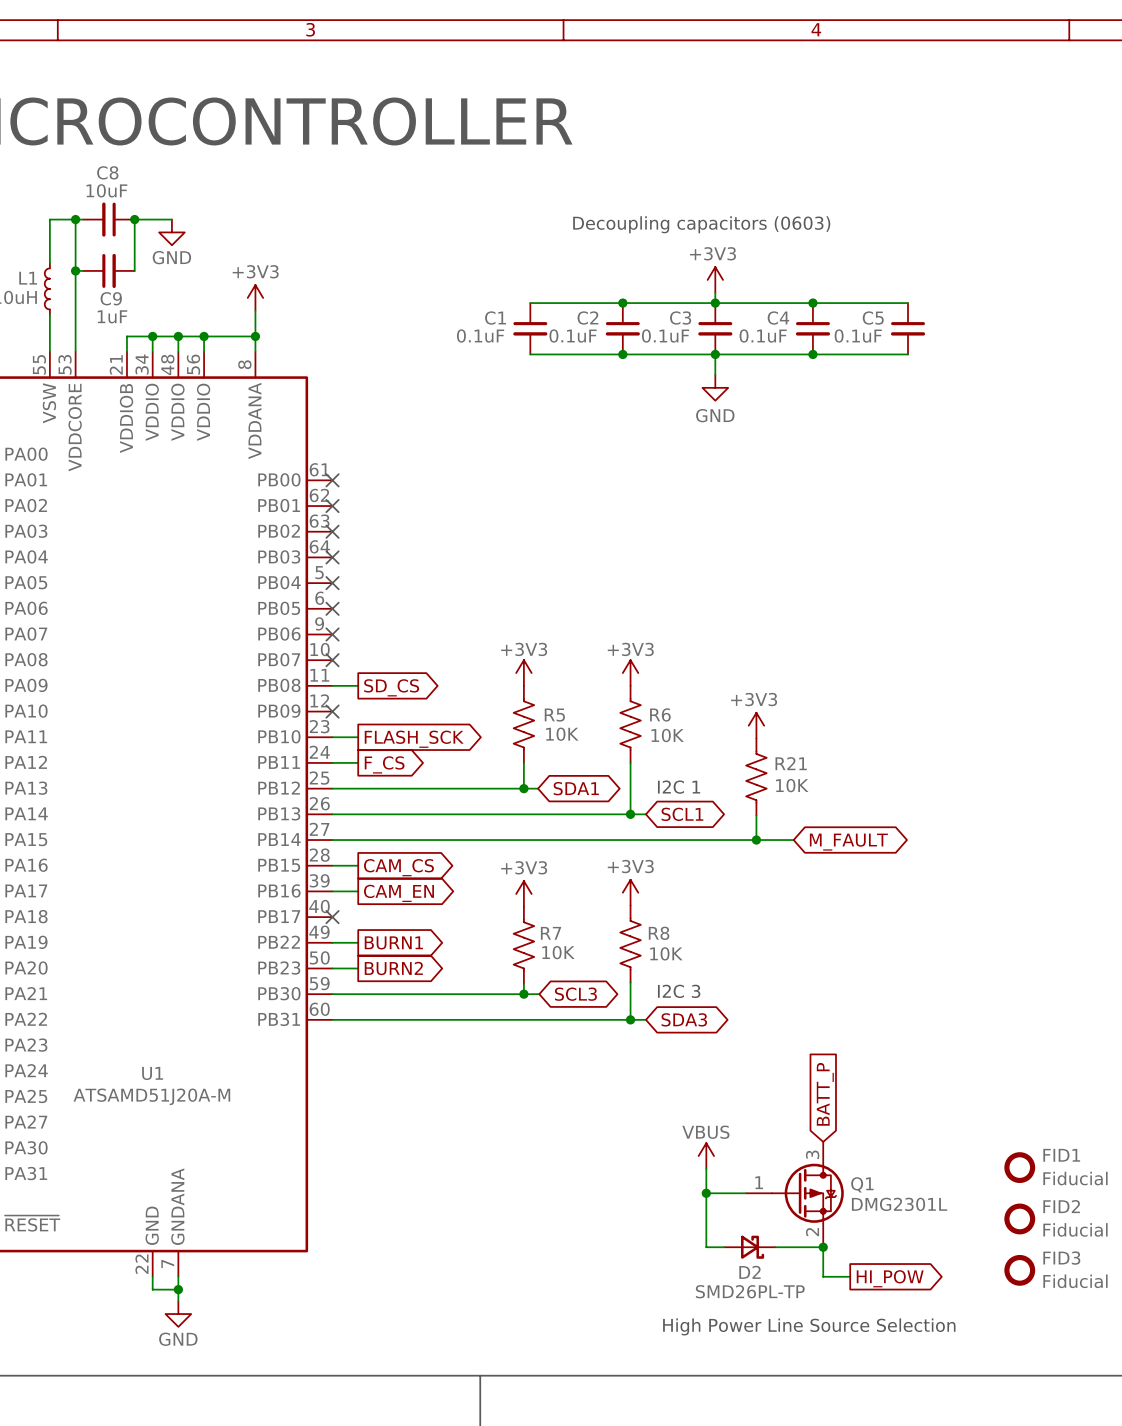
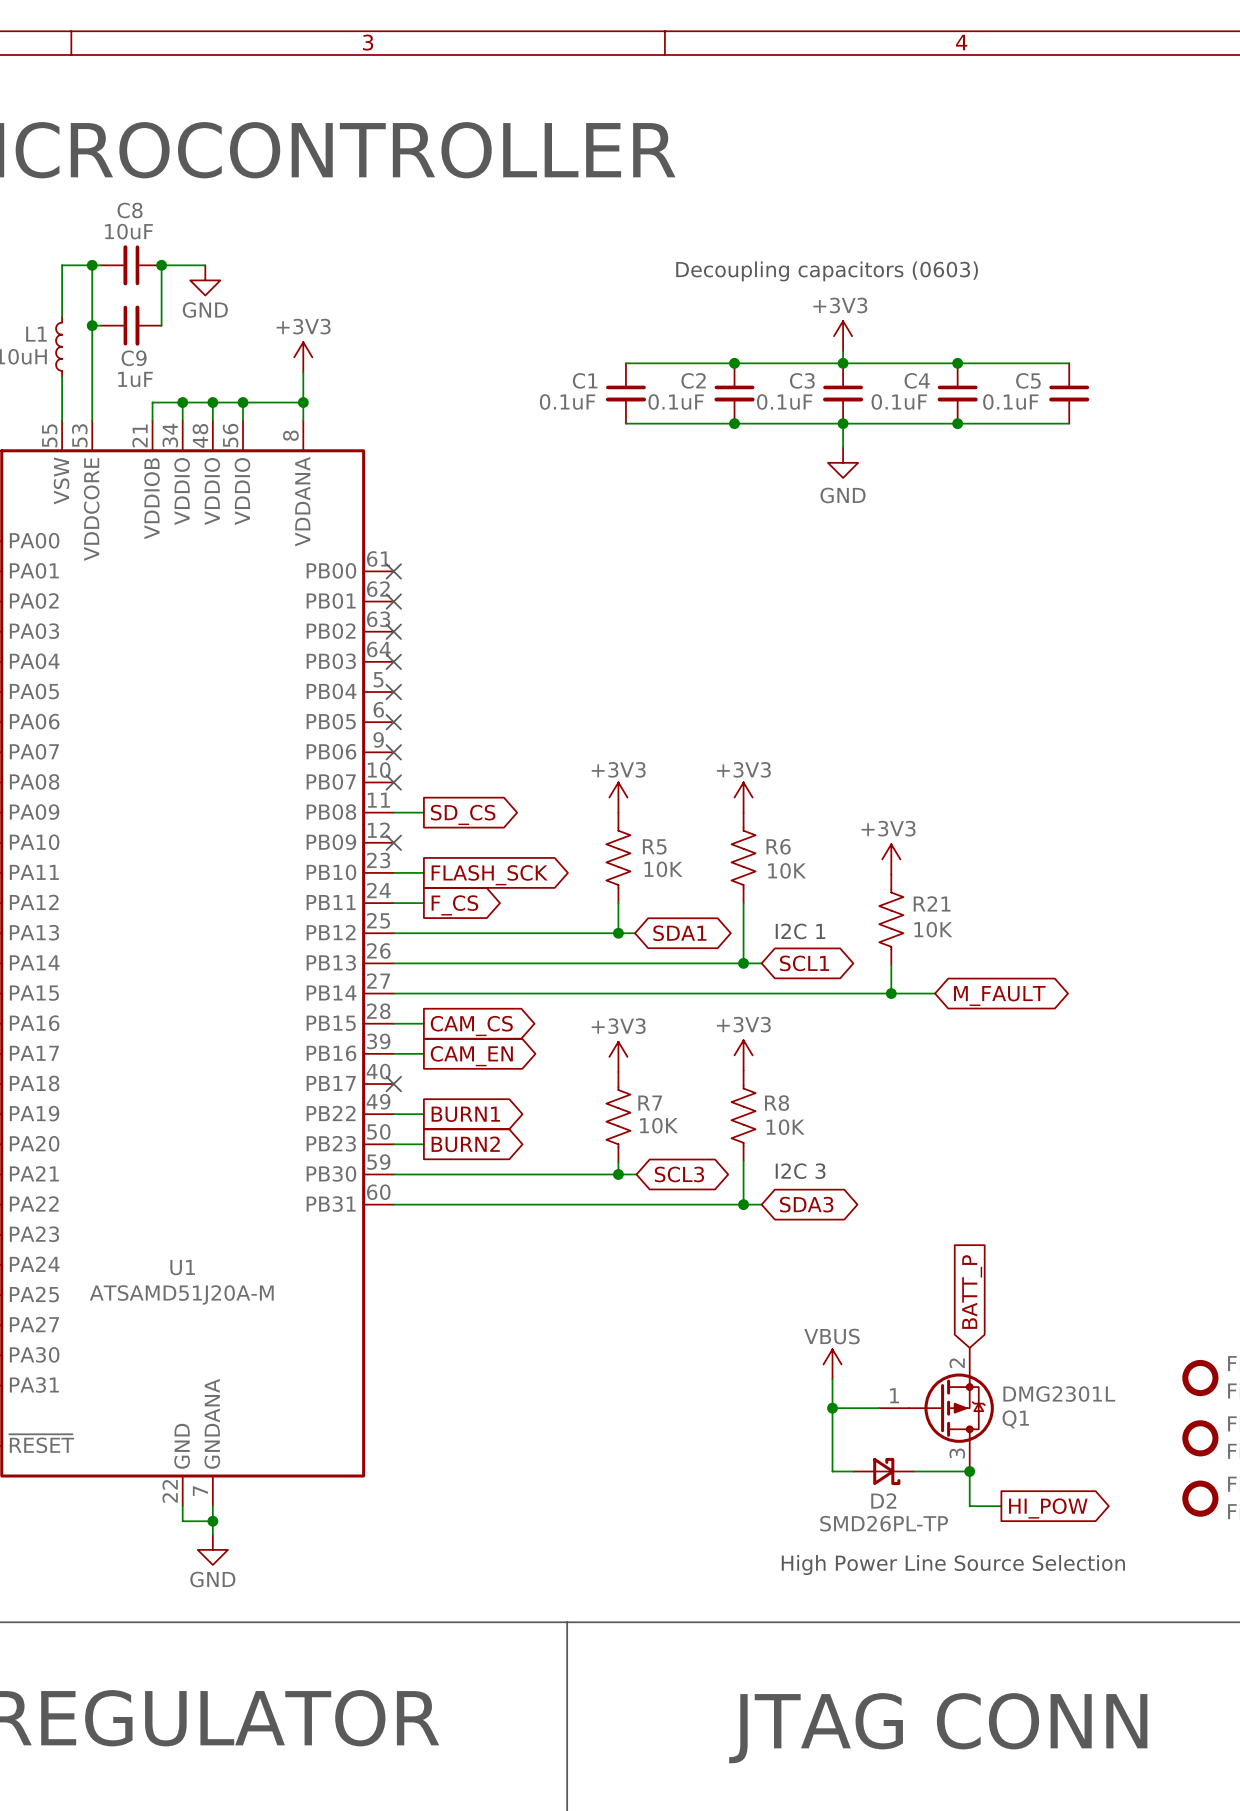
Q1 flip: as is (807, 1193) -> up-down (951, 1408)

